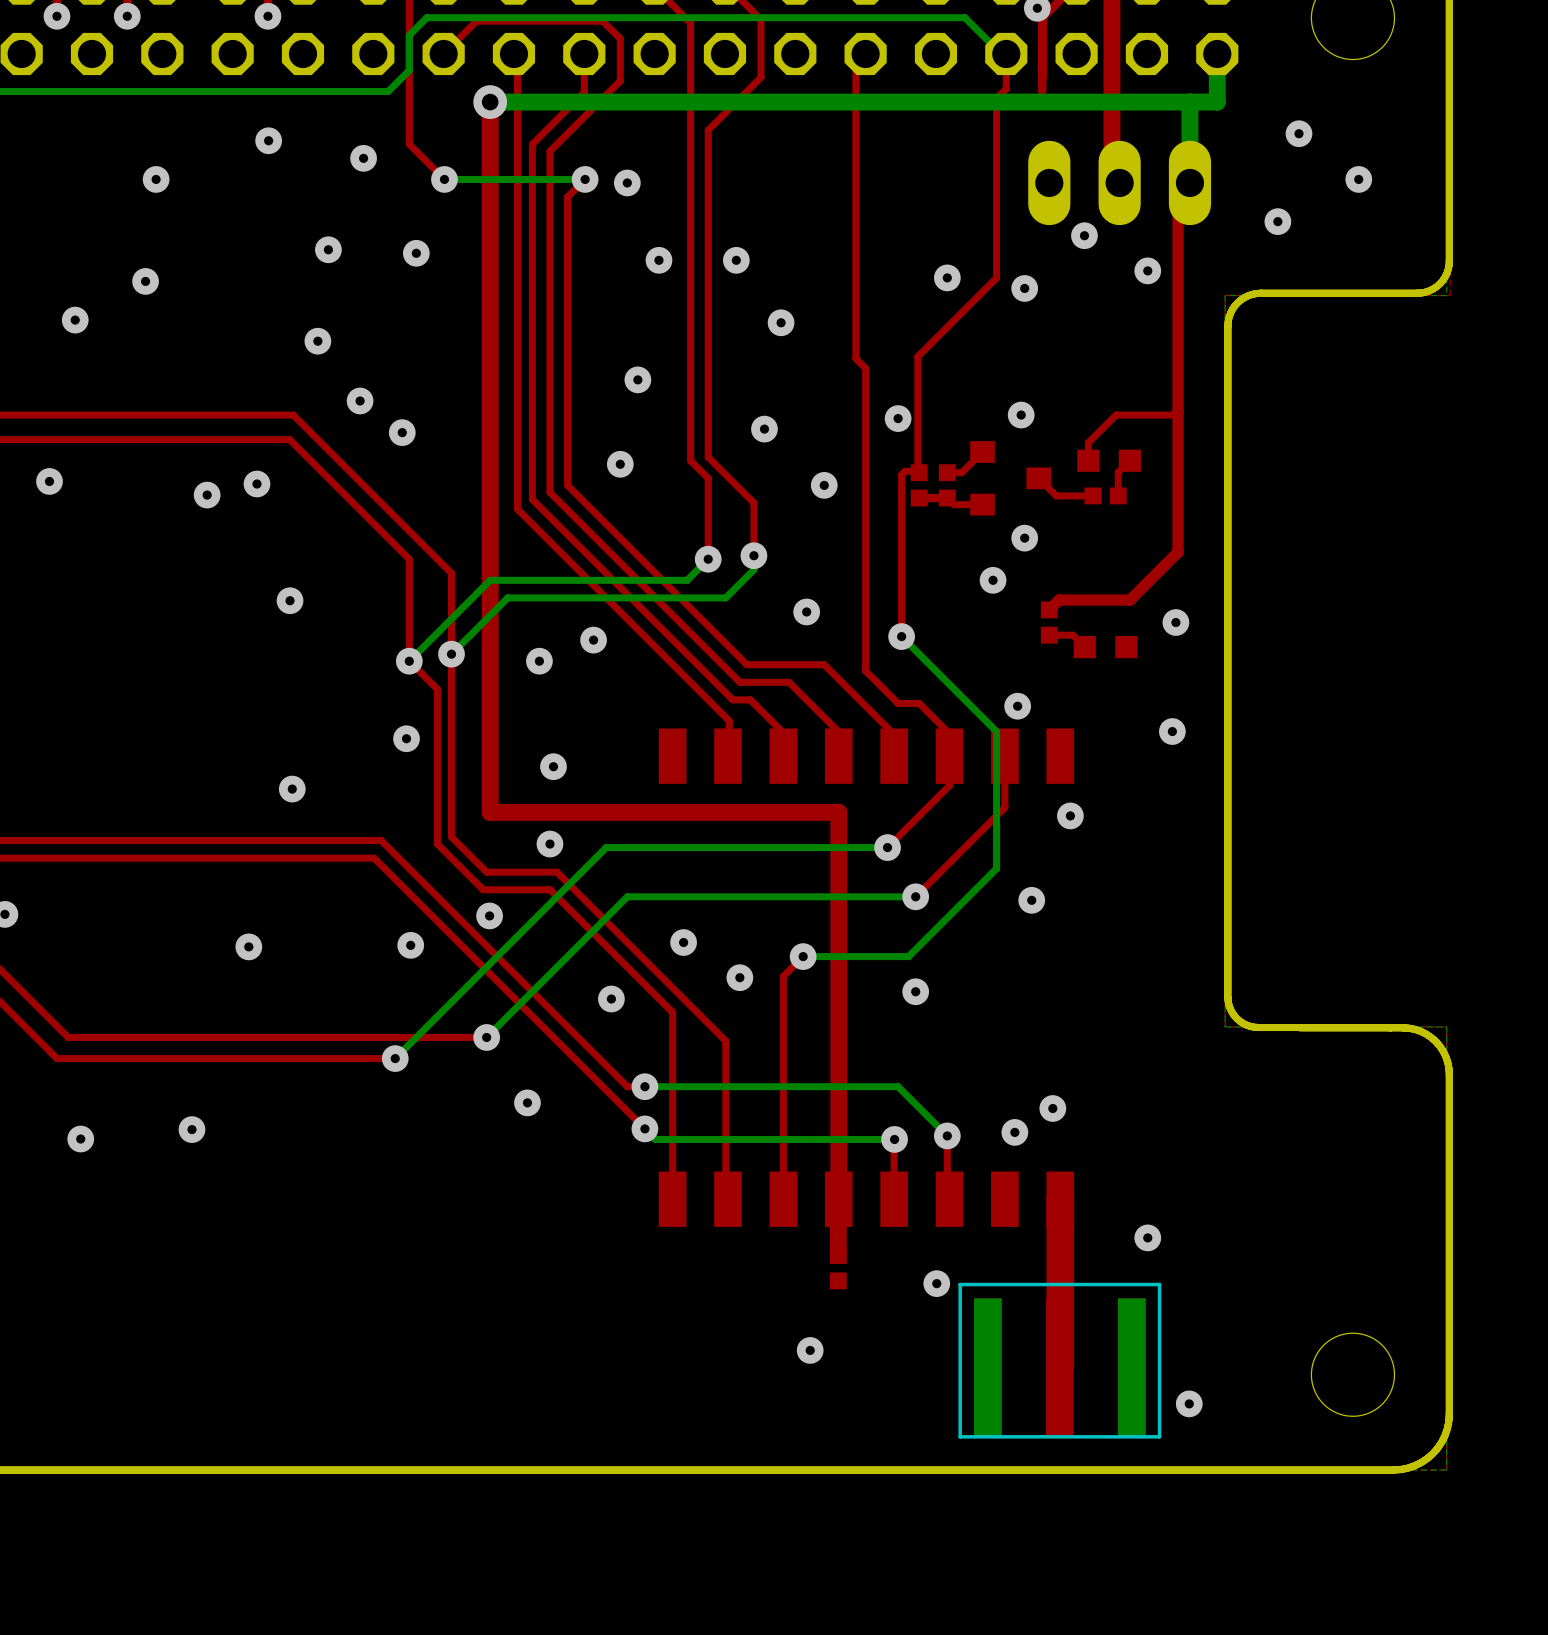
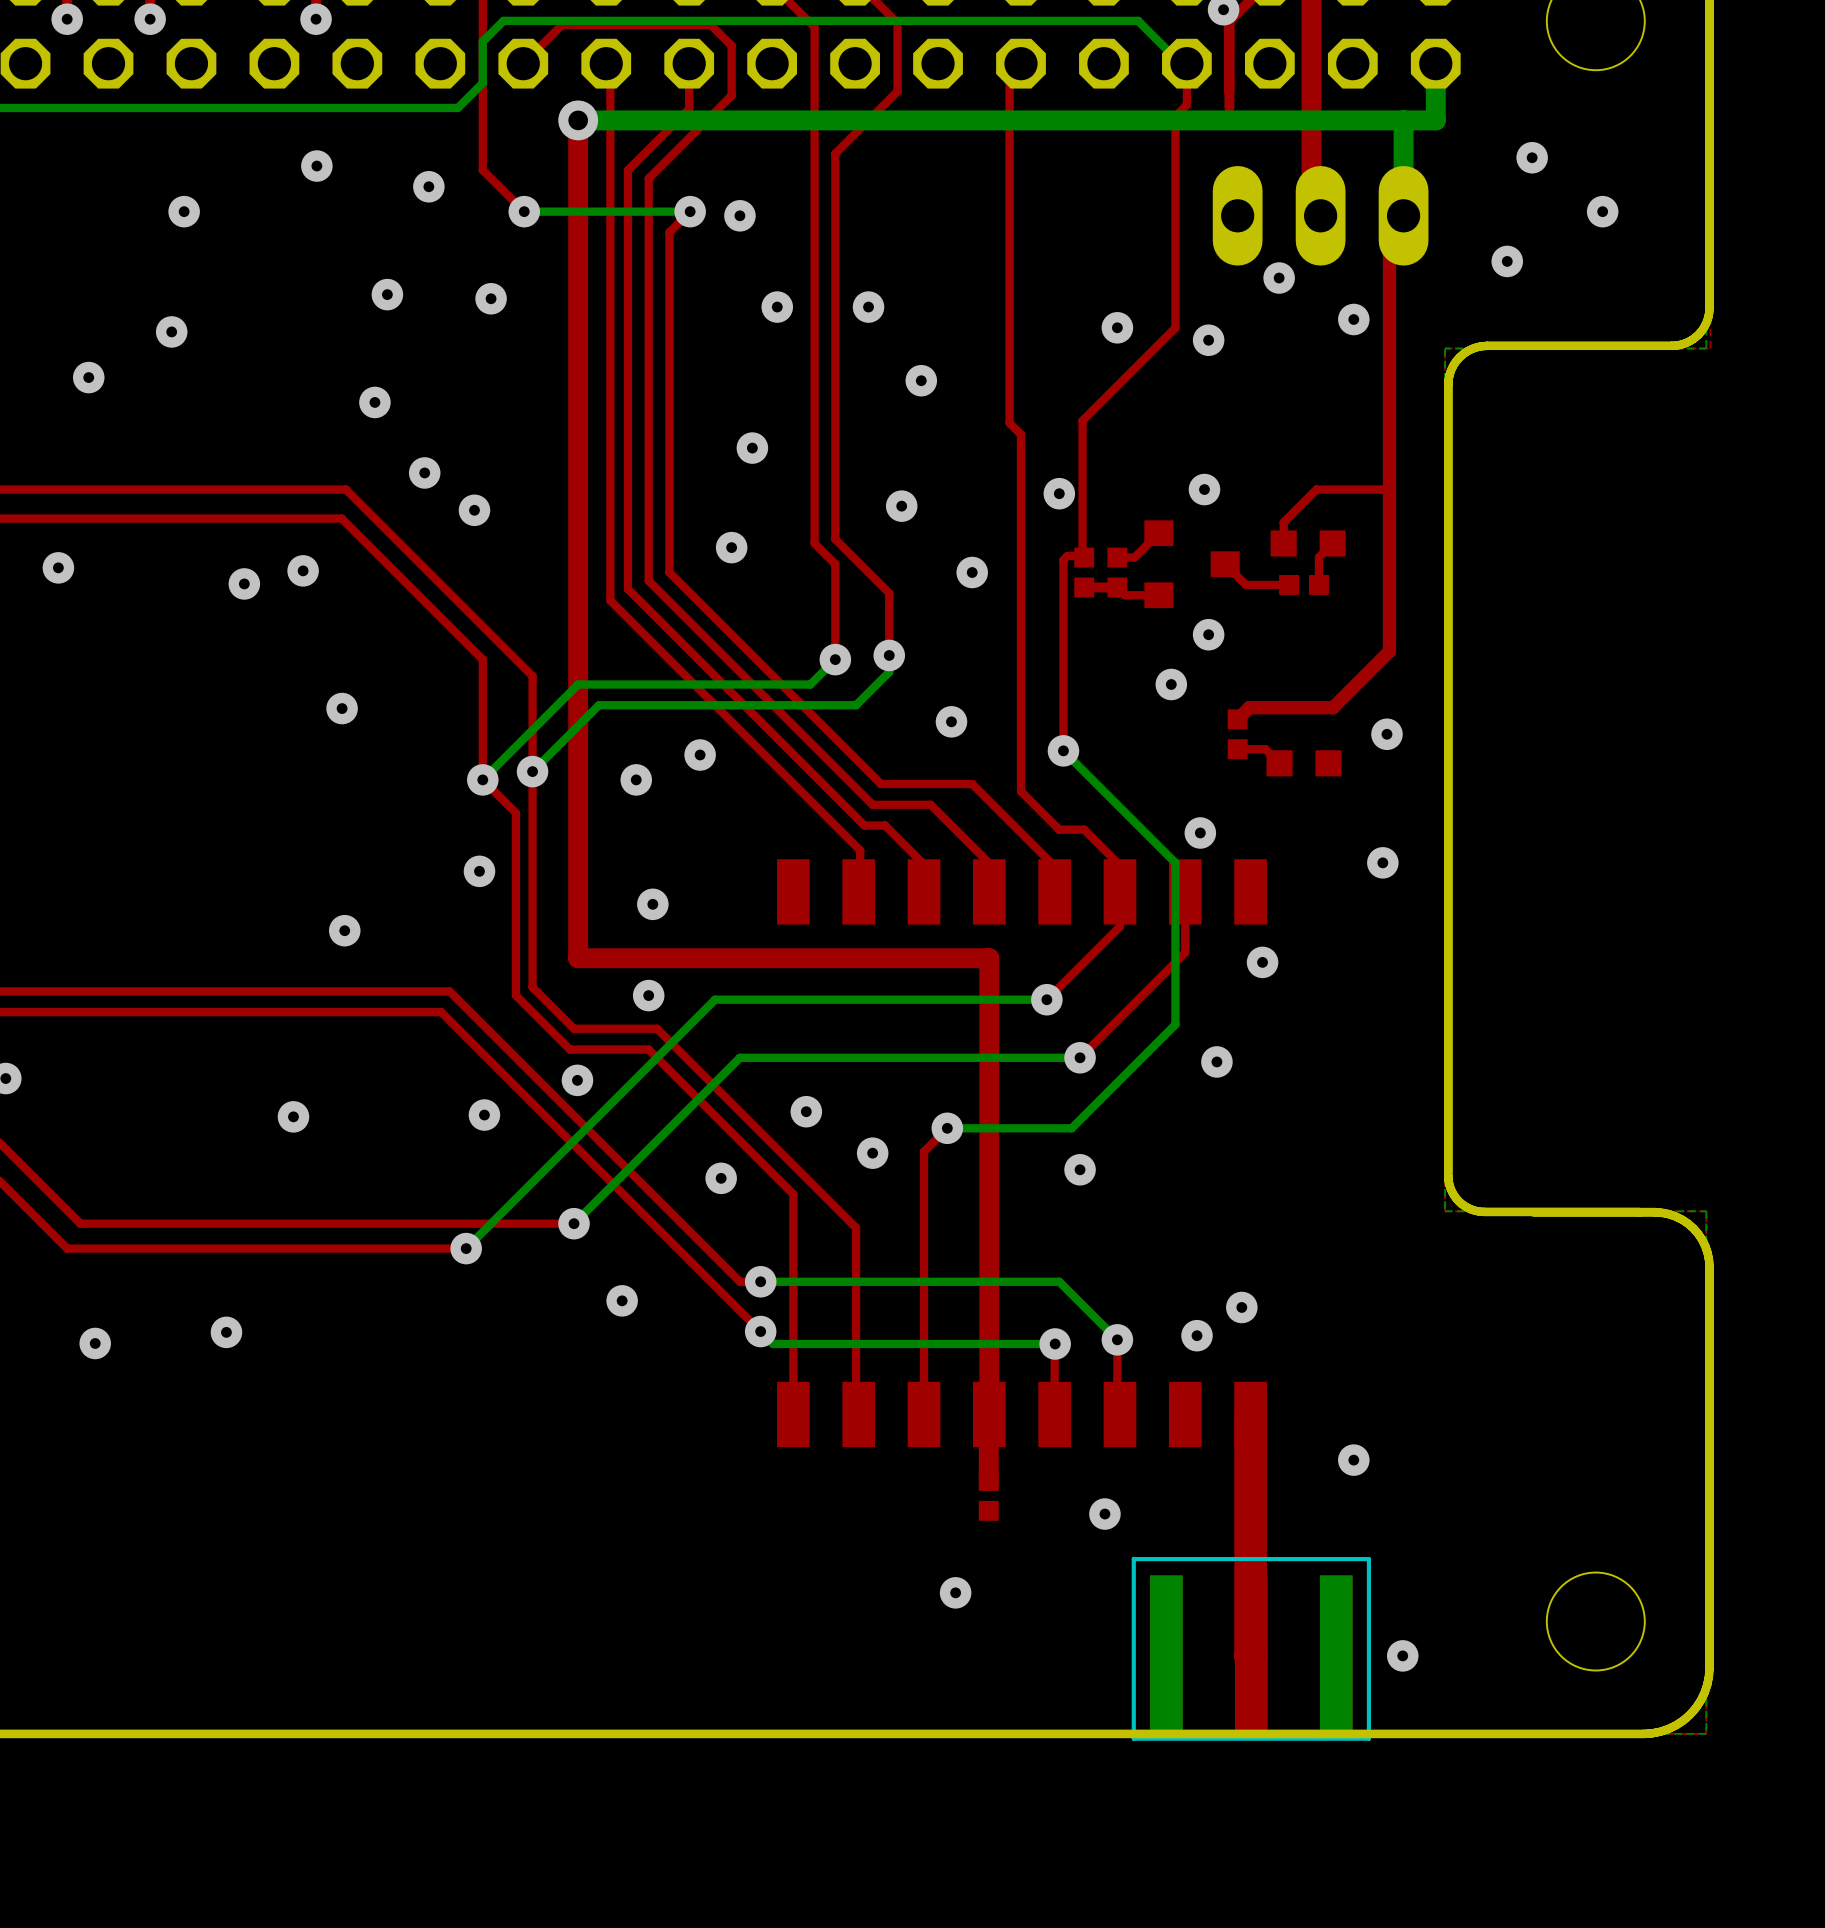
part position: (1059, 1360) -> (1251, 1648)

